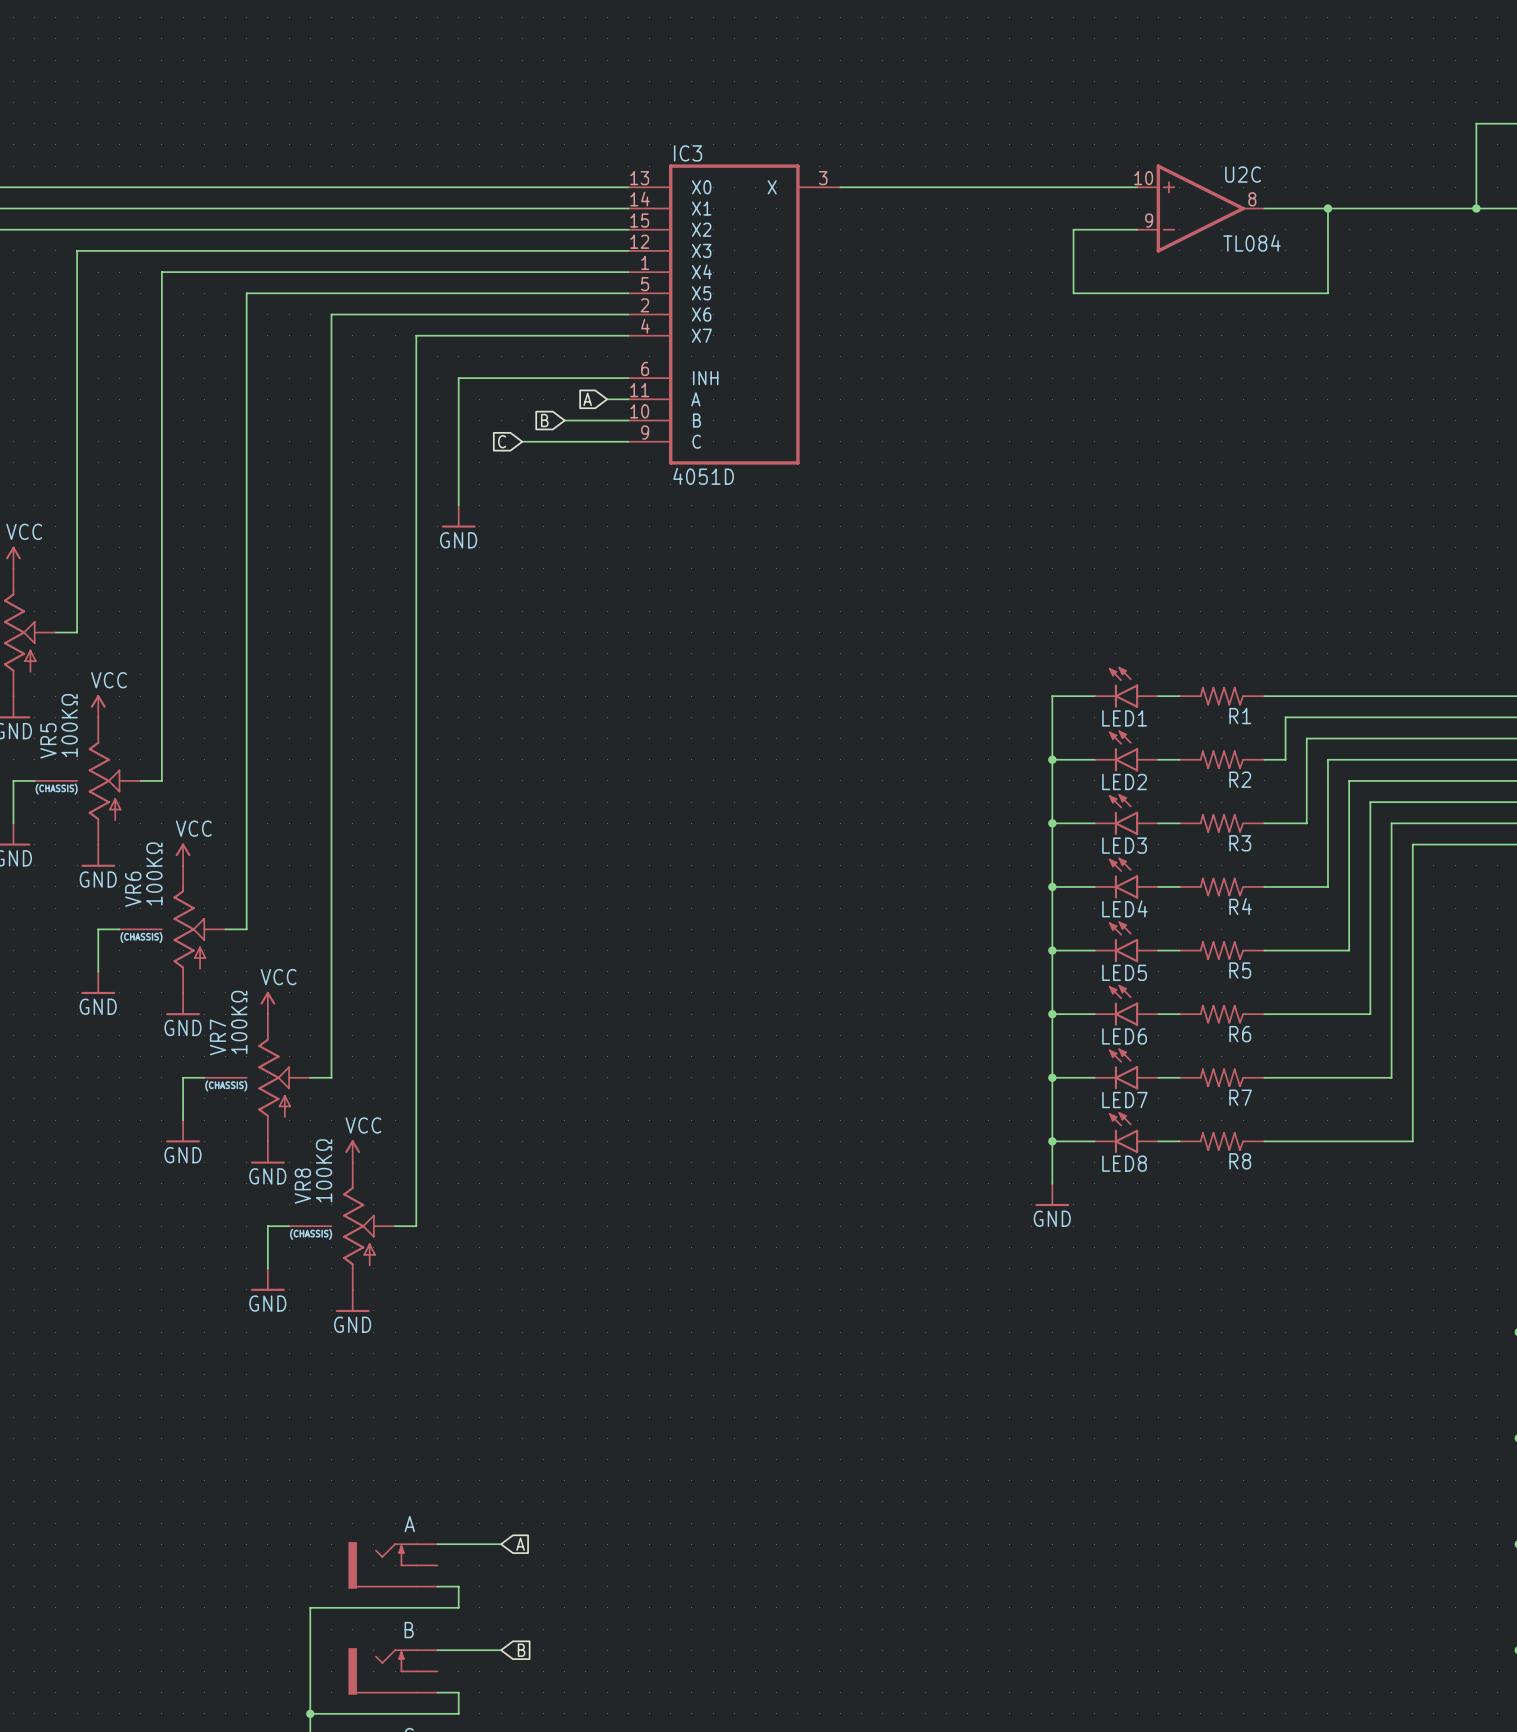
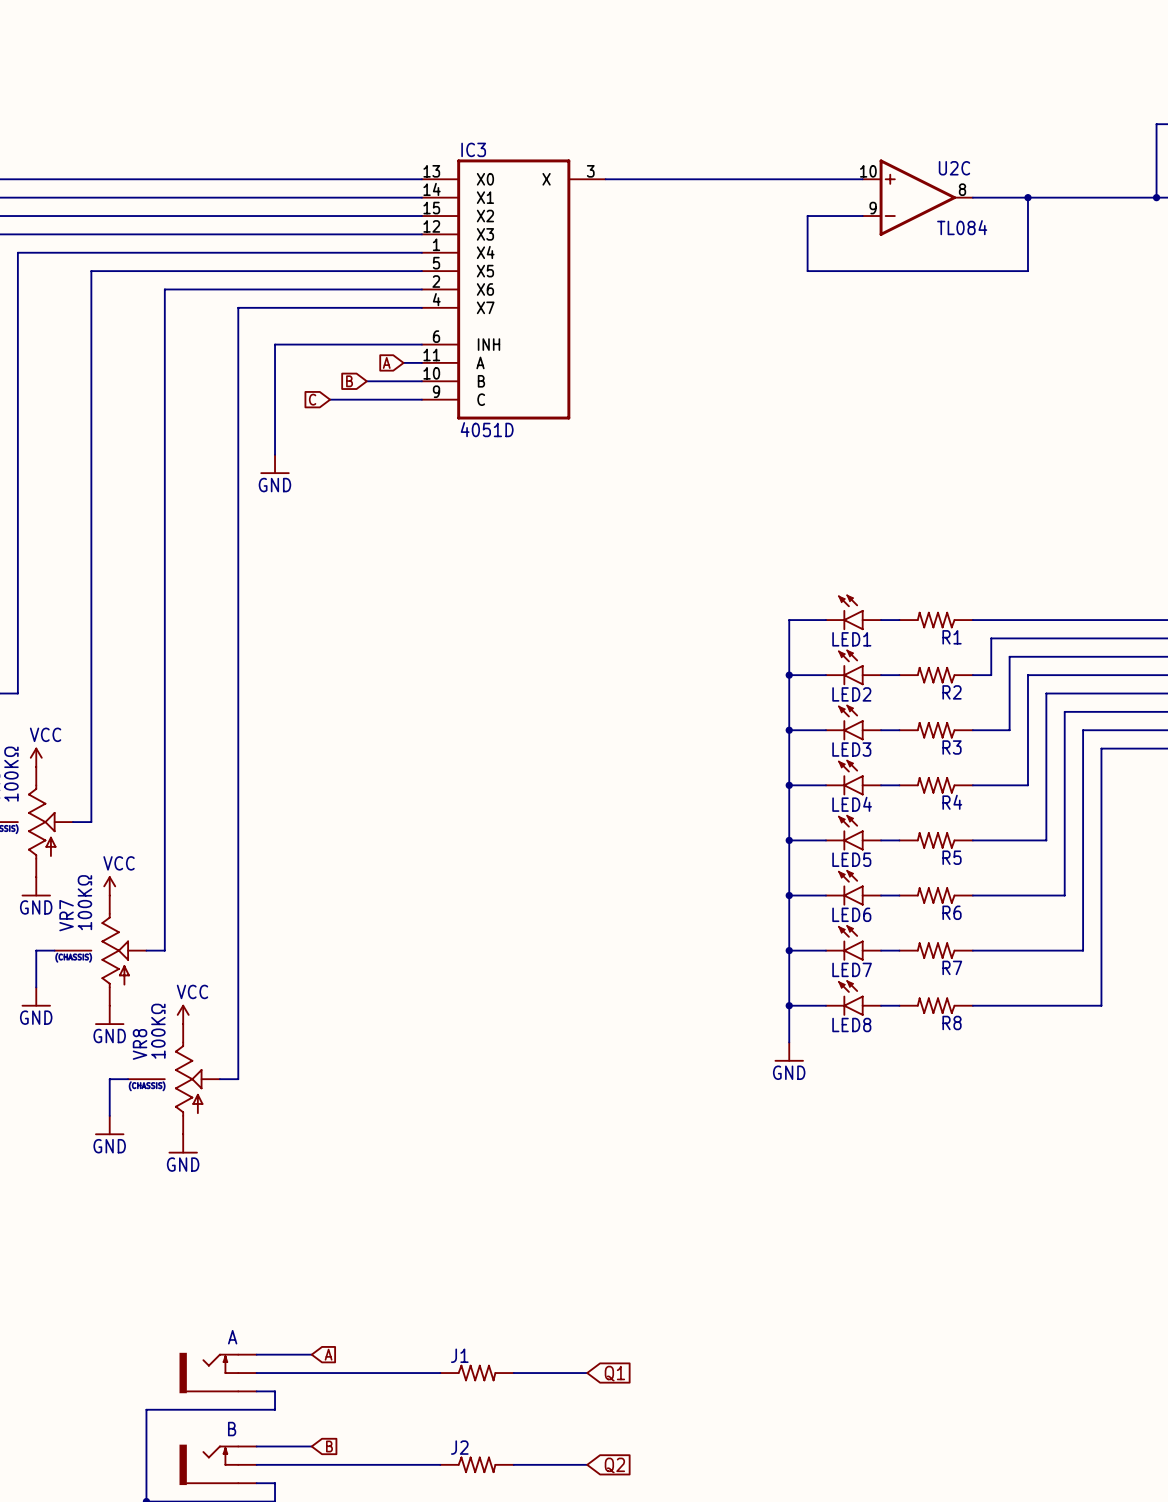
wire: none -> (256, 1373) (440, 1373)
J1: none -> (477, 1373)
wire: none -> (513, 1373) (587, 1373)
global label: none -> Q1 (614, 1373)
wire: none -> (256, 1464) (440, 1464)
J2: none -> (477, 1464)
wire: none -> (513, 1464) (587, 1464)
global label: none -> Q2 (614, 1465)

